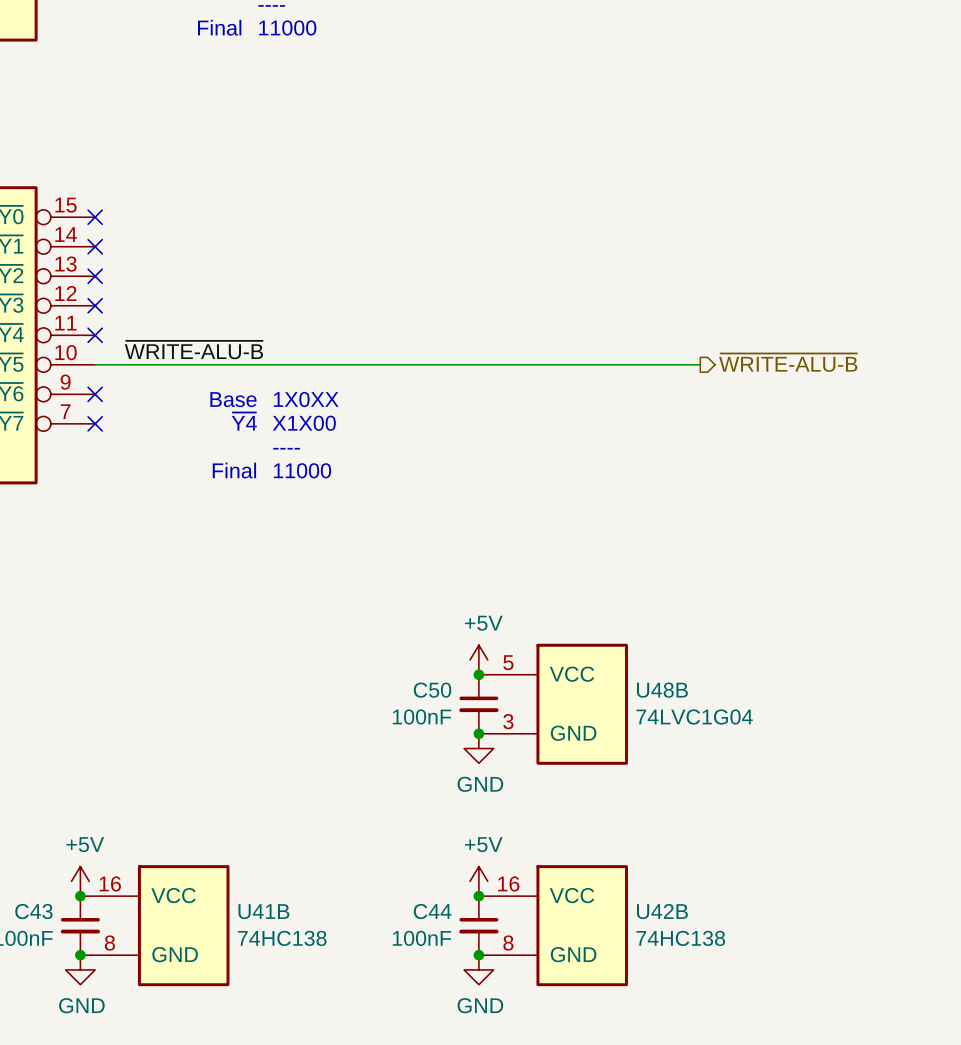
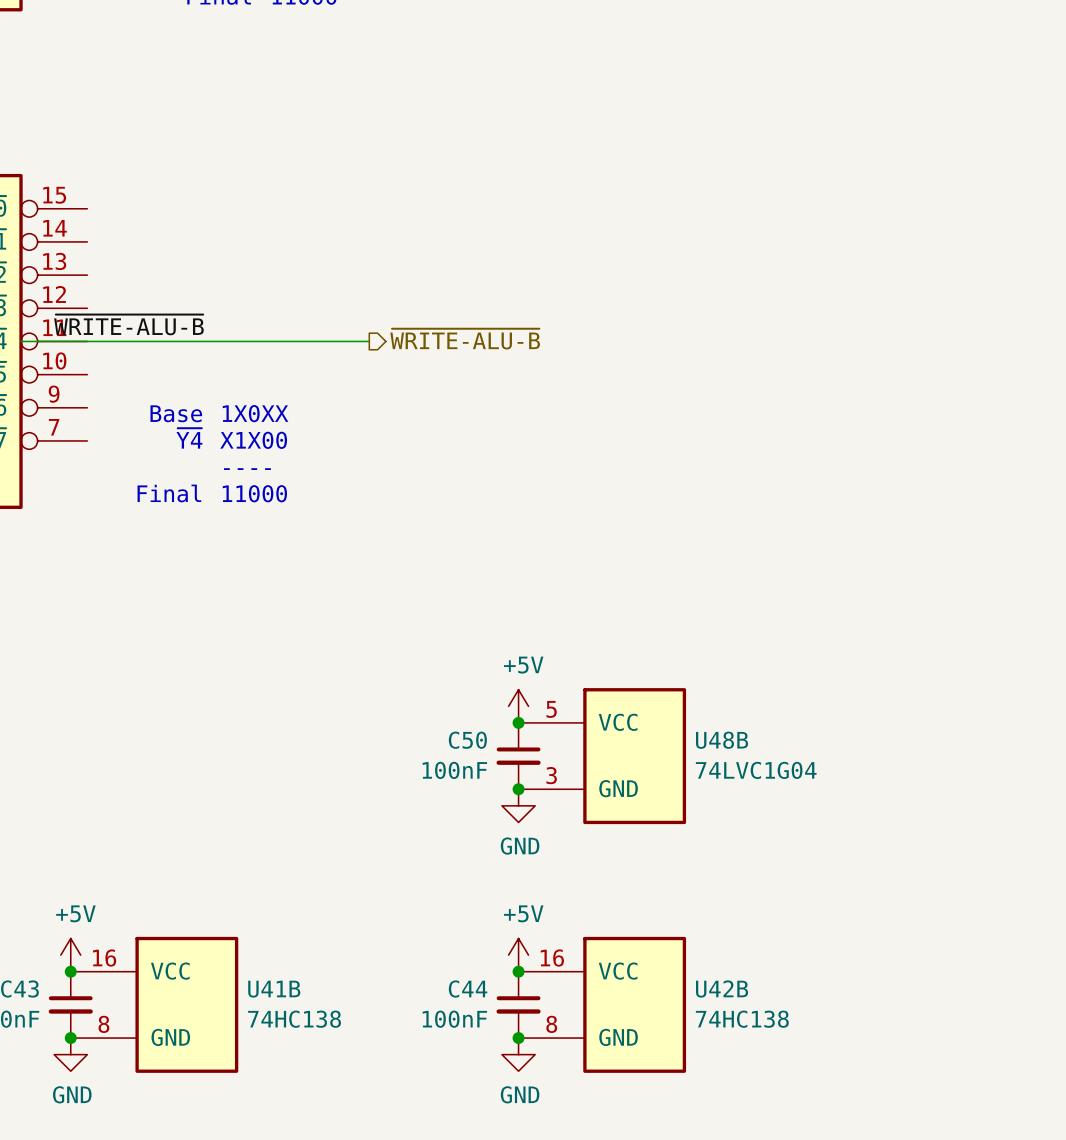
no-connect mark: (95, 217) -> none
no-connect mark: (95, 246) -> none
no-connect mark: (95, 276) -> none
no-connect mark: (95, 305) -> none
hierarchical label: none -> ~{WRITE-ALU-B} (465, 339)
wire: none -> (21, 341) (369, 341)
no-connect mark: (95, 335) -> none
label position: ~{WRITE-ALU-B} (193, 350) -> ~{WRITE-ALU-B} (128, 324)
hierarchical label: ~{WRITE-ALU-B} (788, 362) -> none
wire: (95, 364) (700, 364) -> none
no-connect mark: (95, 394) -> none
text position: Base (233, 399) -> Base (176, 413)
text position: 1X0XX (306, 399) -> 1X0XX (255, 413)
text position: ~{Y4} (244, 421) -> ~{Y4} (189, 438)
no-connect mark: (95, 423) -> none
text position: X1X00 (304, 423) -> X1X00 (253, 440)
text position: ---- (286, 448) -> ---- (247, 469)
text position: Final (234, 470) -> Final (169, 493)
text position: 11000 (302, 470) -> 11000 (254, 493)

